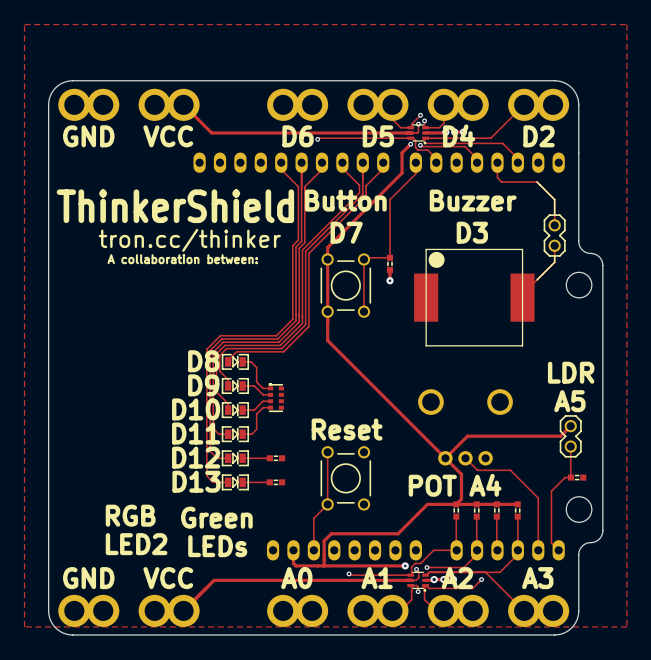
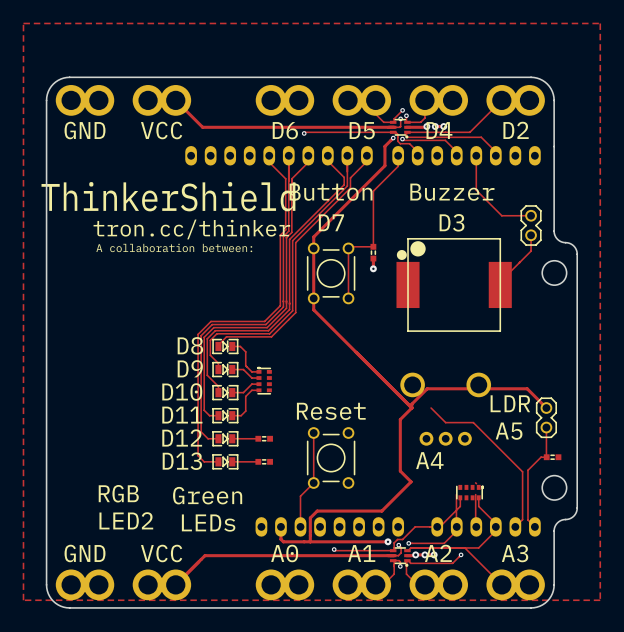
track: (497, 177) (501, 181) (536, 181) (554, 199) (554, 225) -> (476, 170) (476, 190) (501, 215) (531, 215)
line: (536, 181) (554, 199) (554, 214) -> none
part footprint: [414, 248, 535, 347] -> [396, 238, 512, 332]
line: (554, 255) (554, 262) (536, 279) -> none
track: (327, 323) (327, 340) (461, 474) (461, 499) (456, 504) -> (313, 309) (411, 408)
text position: LDR (571, 372) -> LDR (510, 403)
text position: A5 (569, 401) -> A5 (509, 431)
track: (570, 426) (560, 436) (467, 436) (445, 458) -> (546, 408) (527, 388) (427, 388) (411, 404) (411, 408)
track: (465, 458) (477, 470) (510, 470) (538, 498) (538, 550) -> (431, 408) (445, 422) (473, 422) (522, 471) (522, 519) (515, 526)
text: POT A4 (455, 485) -> A4 (429, 460)
track: (517, 504) (427, 504) (398, 533) -> (411, 408) (400, 419) (400, 471) (411, 481) (381, 511)
part: (456, 510) -> none
part: (476, 510) -> none
part: (496, 510) -> none
part: (517, 510) -> none
part: none -> (469, 492)
track: (456, 516) (456, 550) -> none
track: (517, 517) (517, 546) -> (478, 497) (478, 506) (495, 523)
track: none -> (460, 497) (460, 506) (439, 526)

